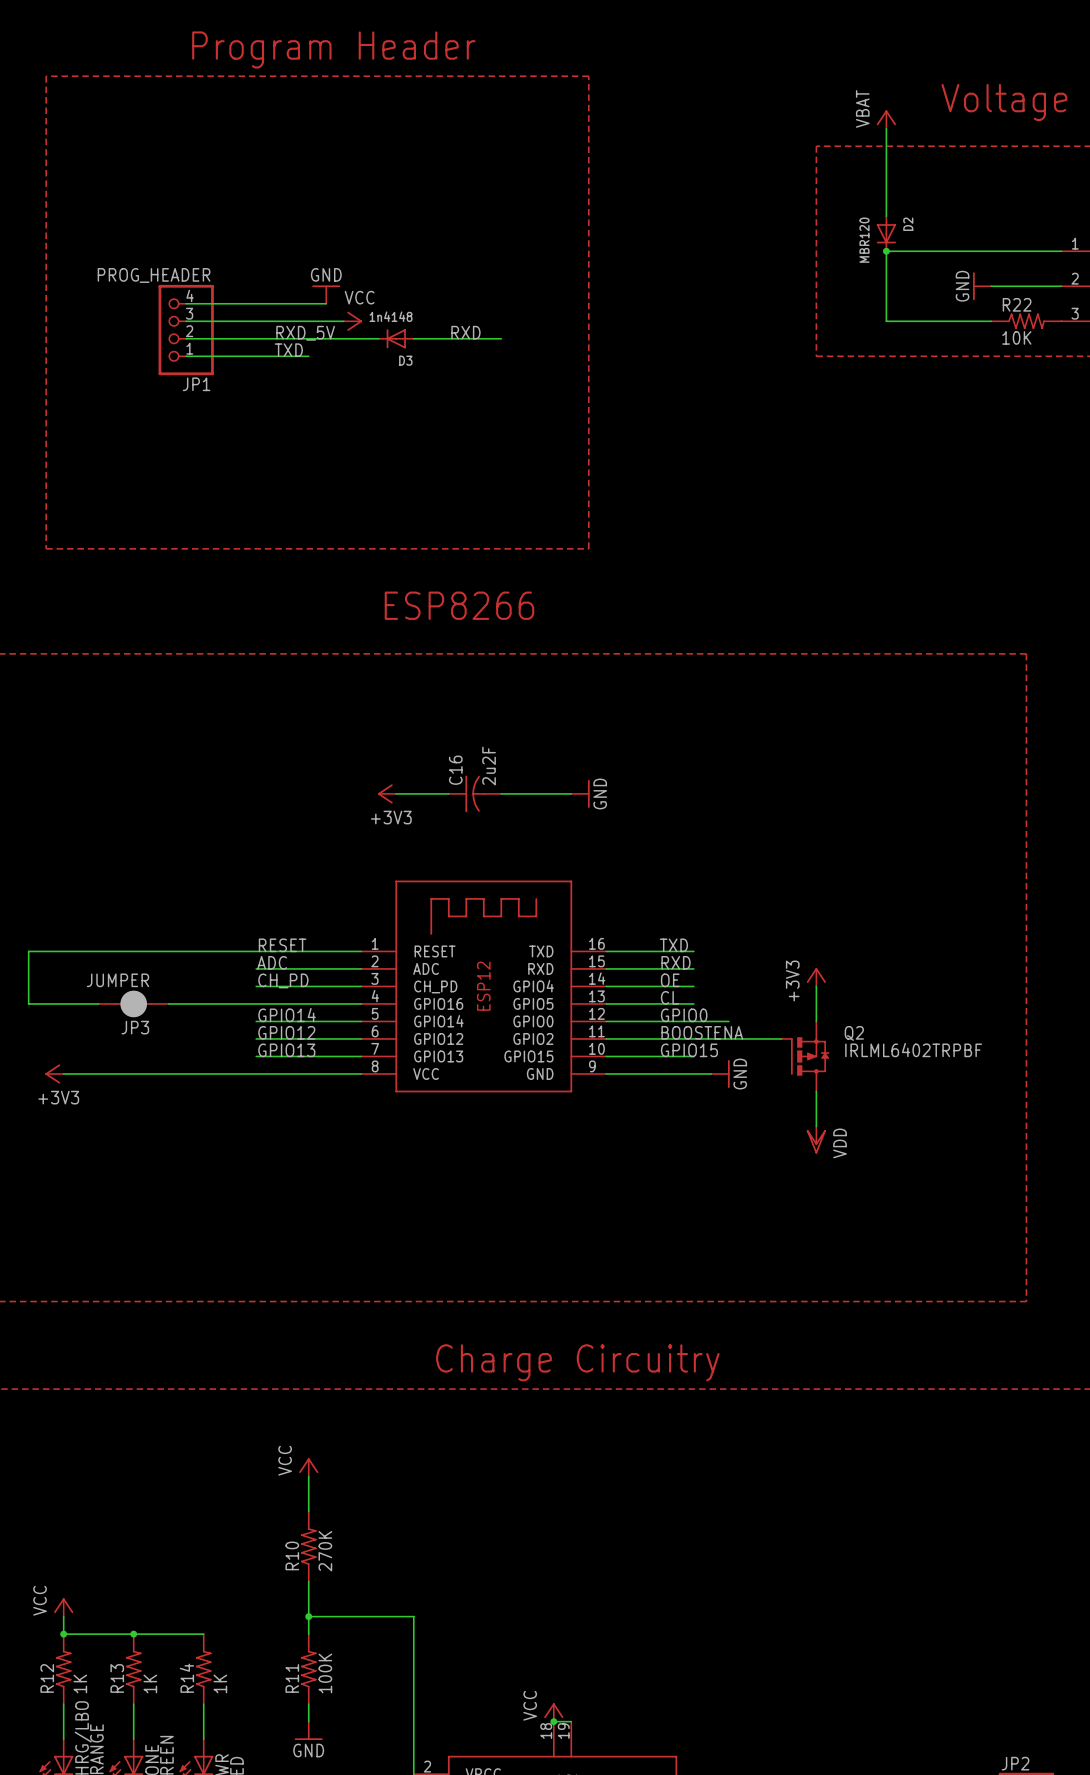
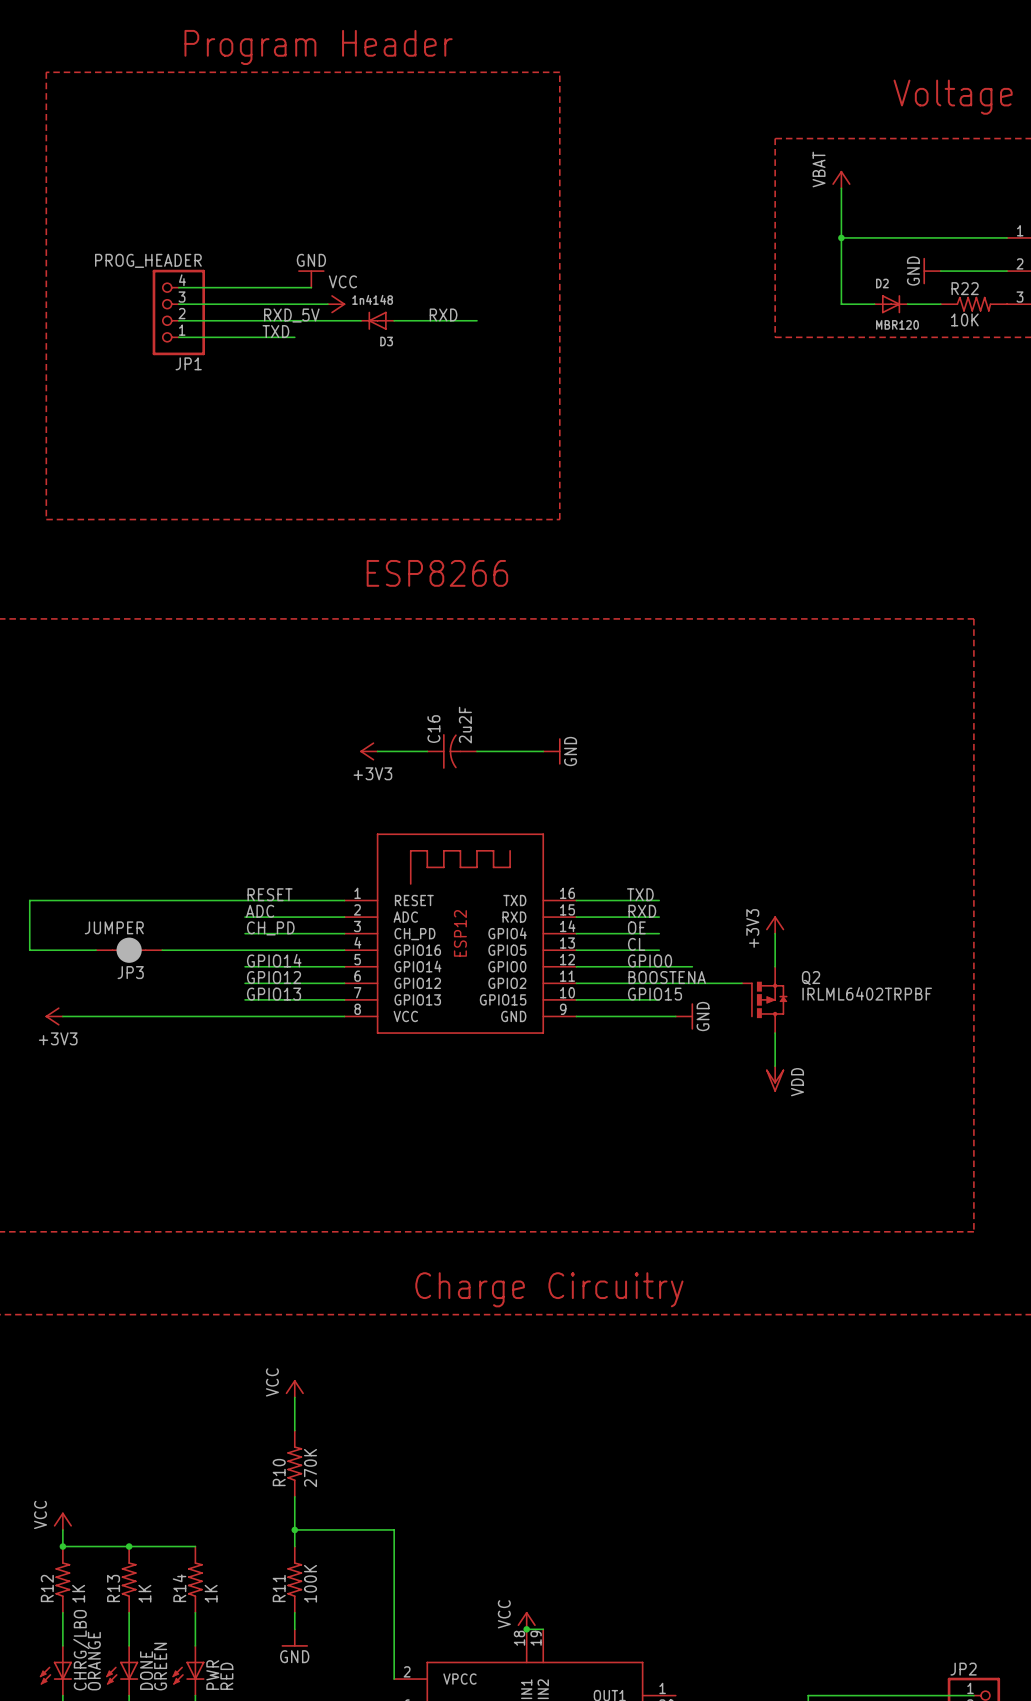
power symbol position: VBAT (886, 119) -> VBAT (841, 179)
wire: (886, 128) (886, 198) -> none
D2 rotation: 0° (886, 233) -> 90° counterclockwise (891, 304)
D2 position: (886, 233) -> (891, 304)

